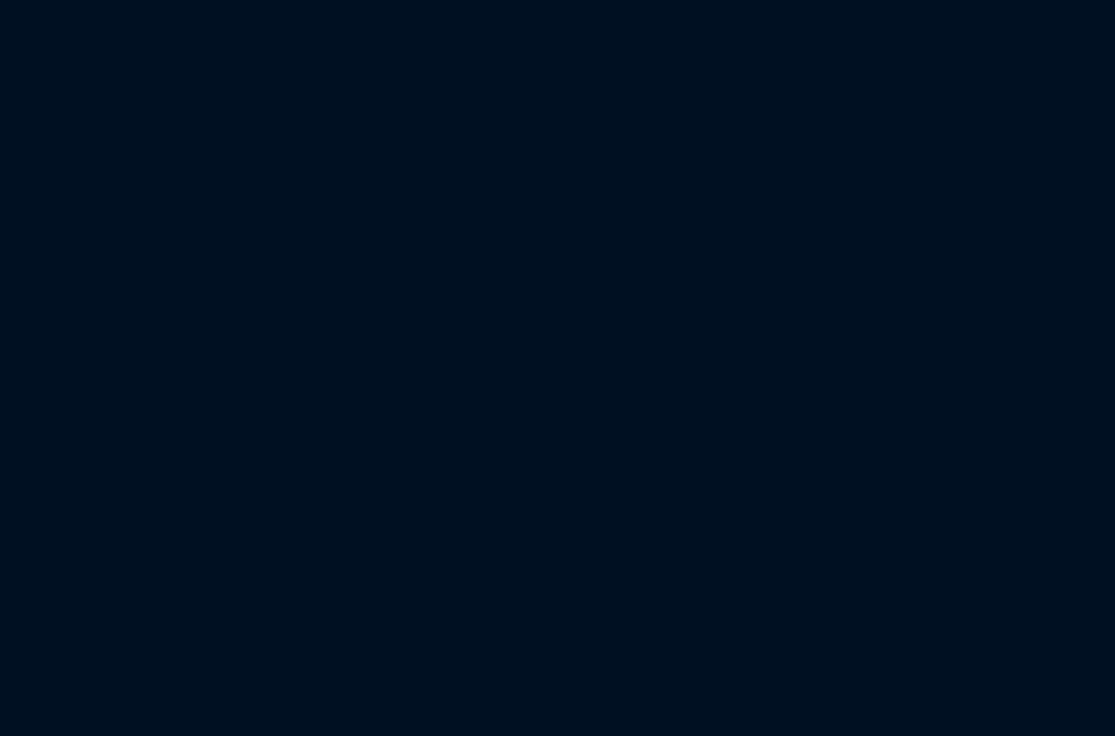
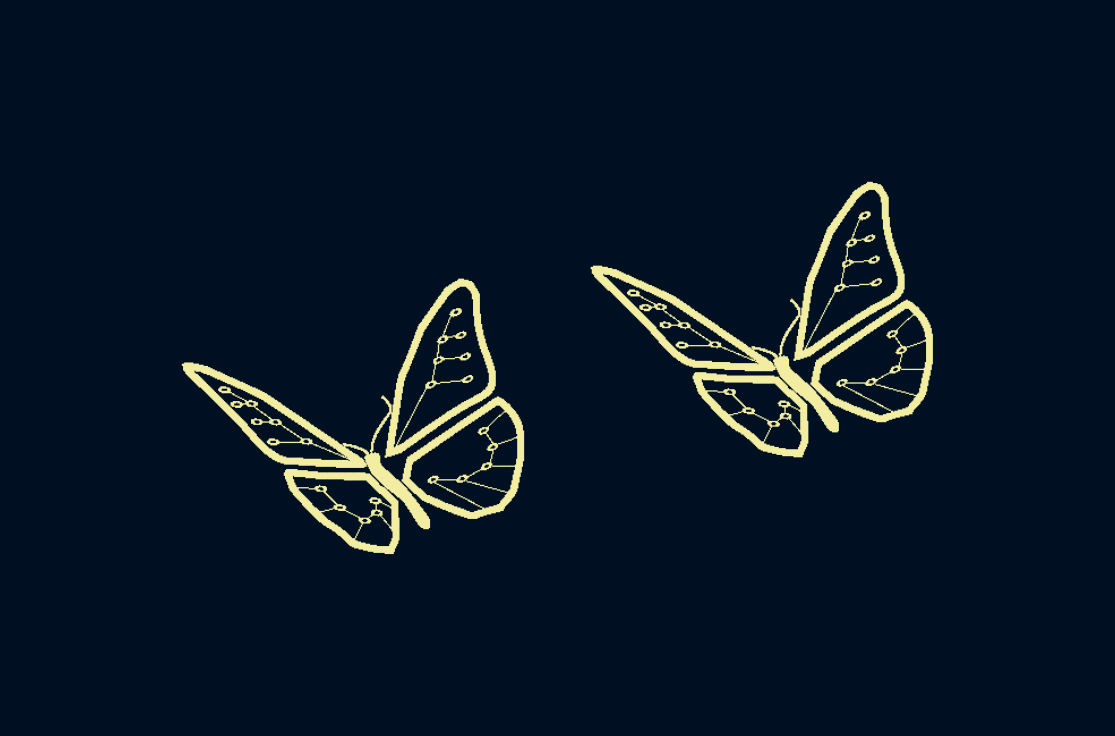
drawing: none -> [590, 181, 933, 458]
drawing: none -> [181, 278, 525, 555]

